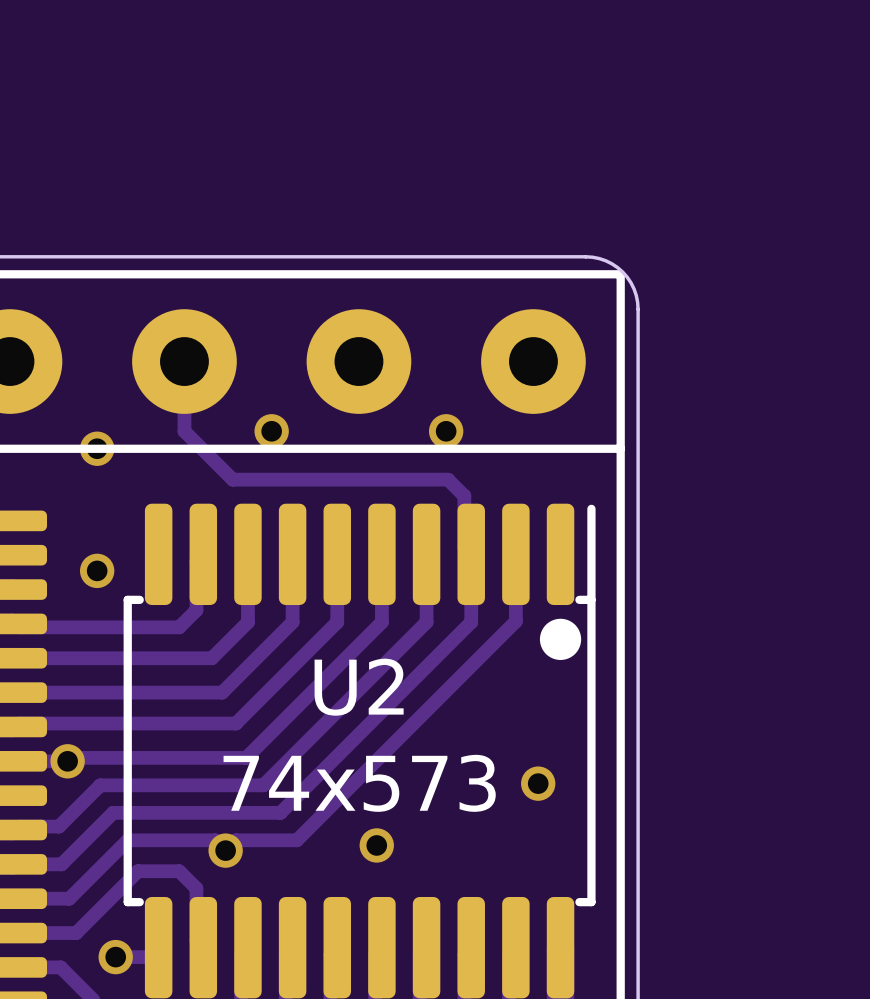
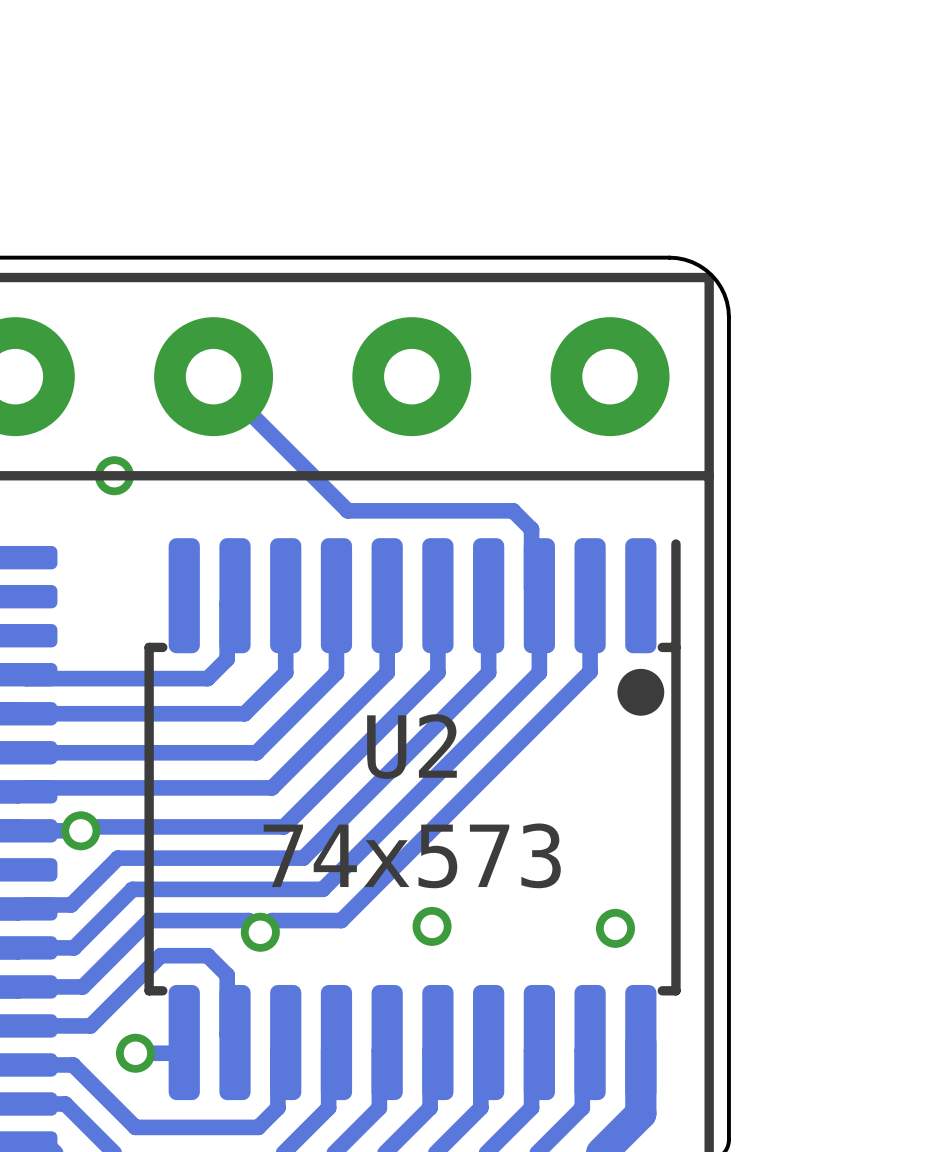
track: (184, 361) (184, 431) (232, 479) (302, 479) -> (213, 376) (347, 510)
via: (271, 431) -> none
via: (446, 431) -> none
via: (97, 570) -> none
via position: (538, 783) -> (615, 928)

